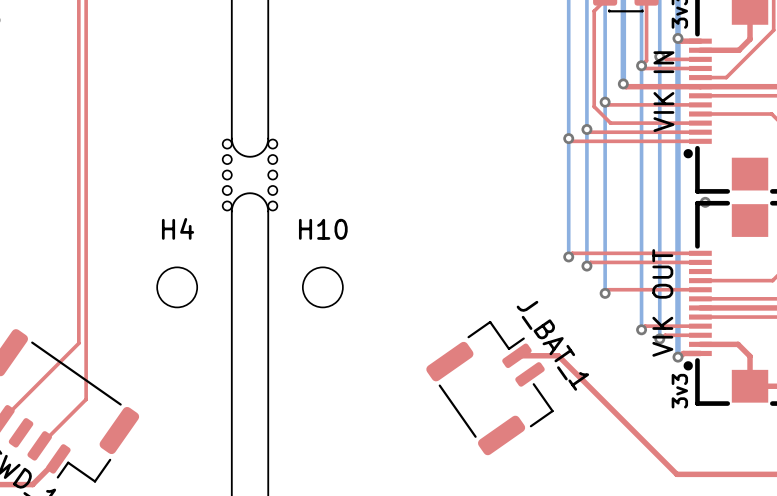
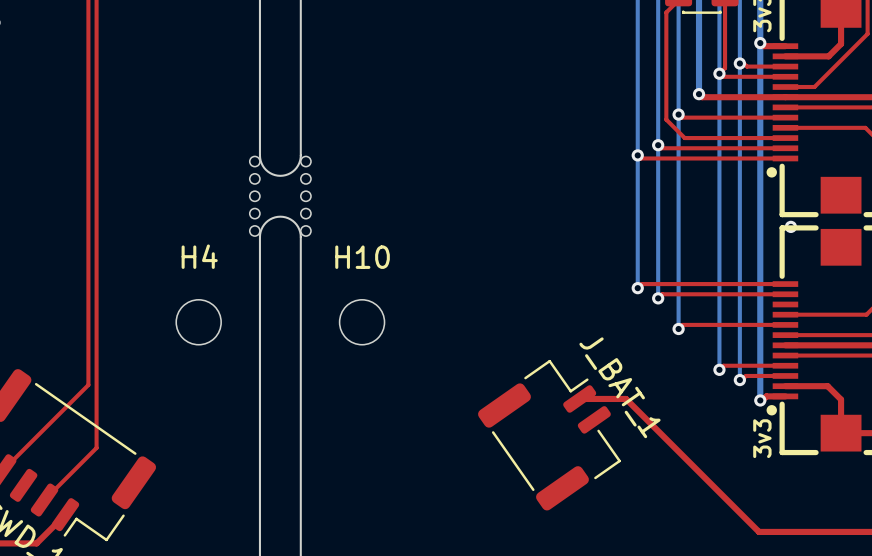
part text: VIK IN (663, 91) -> none
part text: VIK OUT (662, 302) -> none

